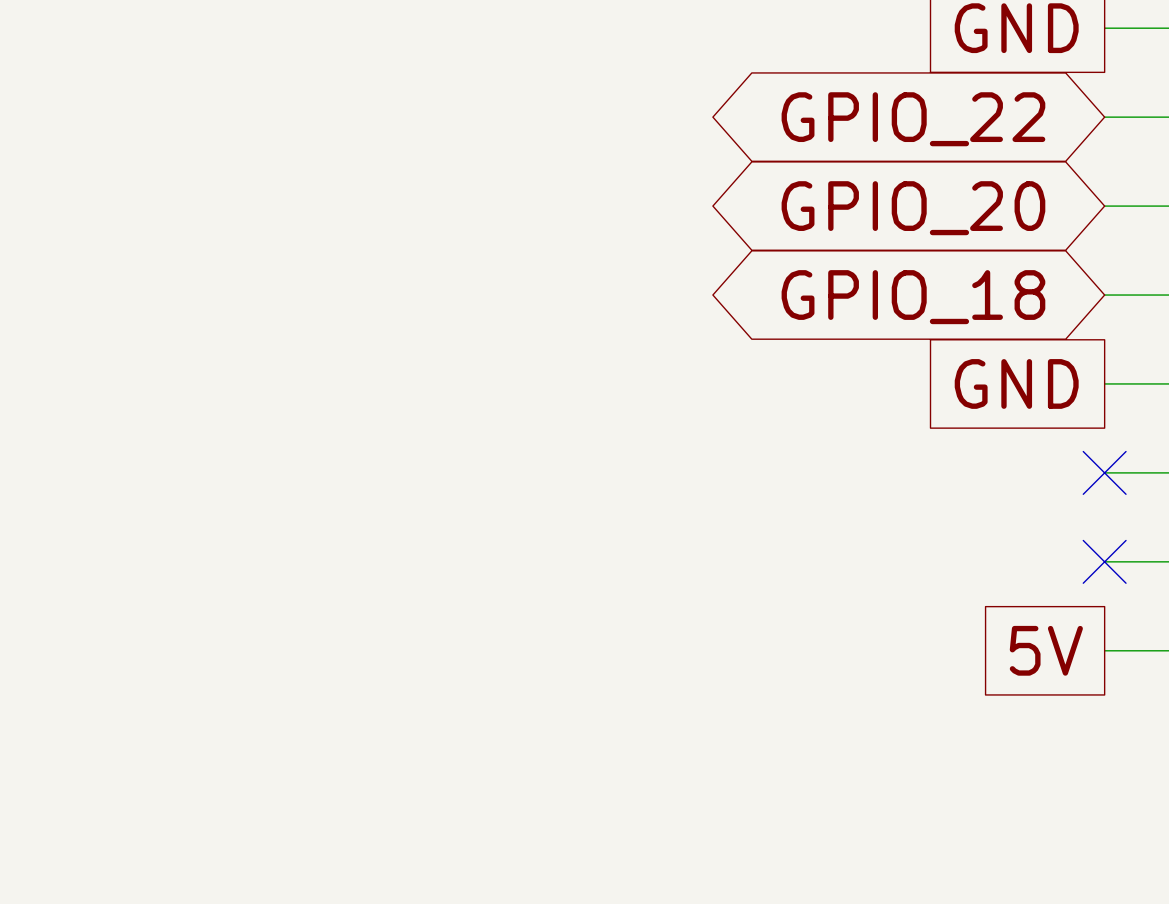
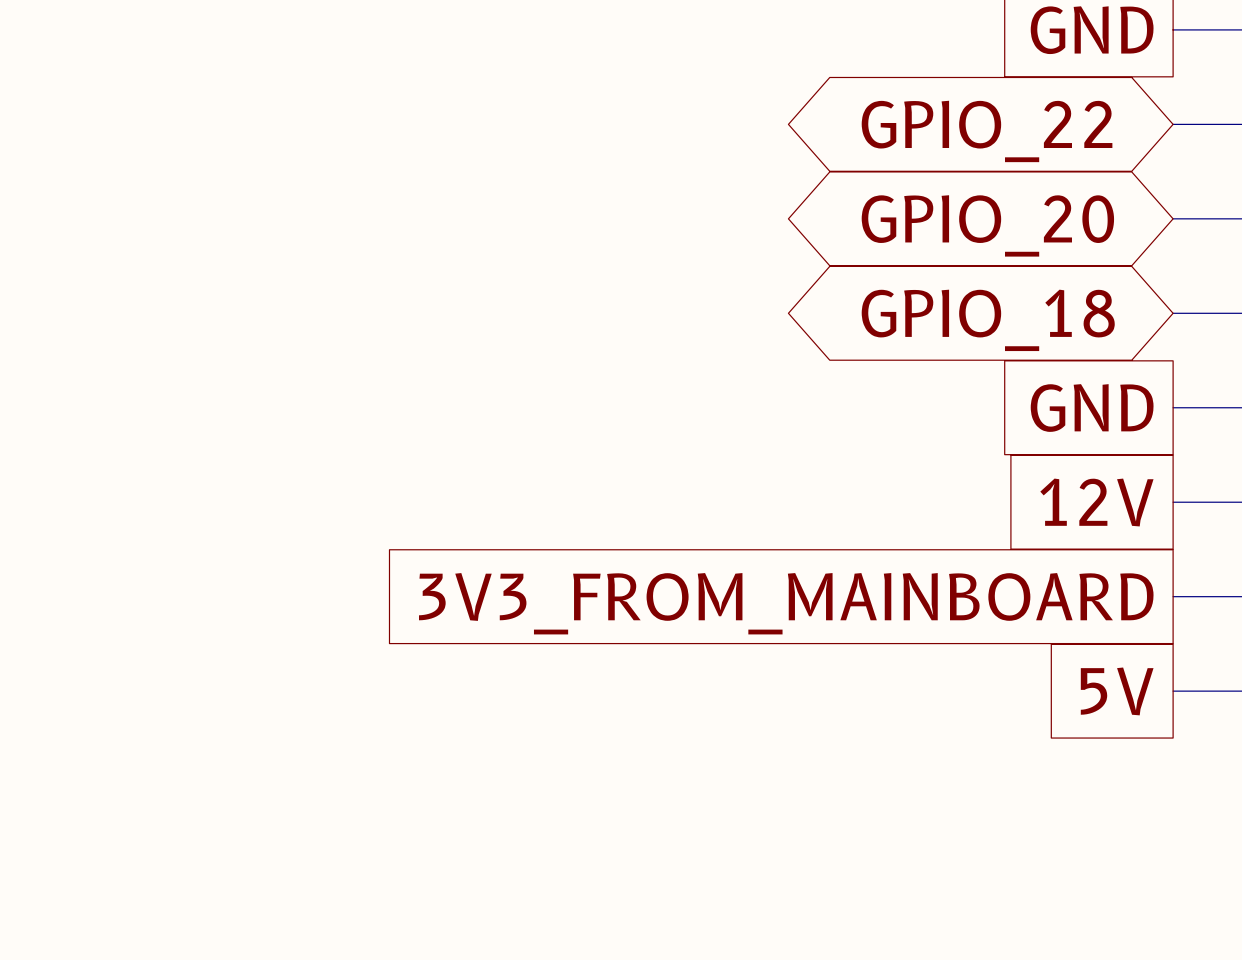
global label: none -> 12V (1096, 502)
no-connect mark: (1104, 472) -> none
no-connect mark: (1104, 561) -> none
global label: none -> 3V3_FROM_MAINBOARD (786, 603)

